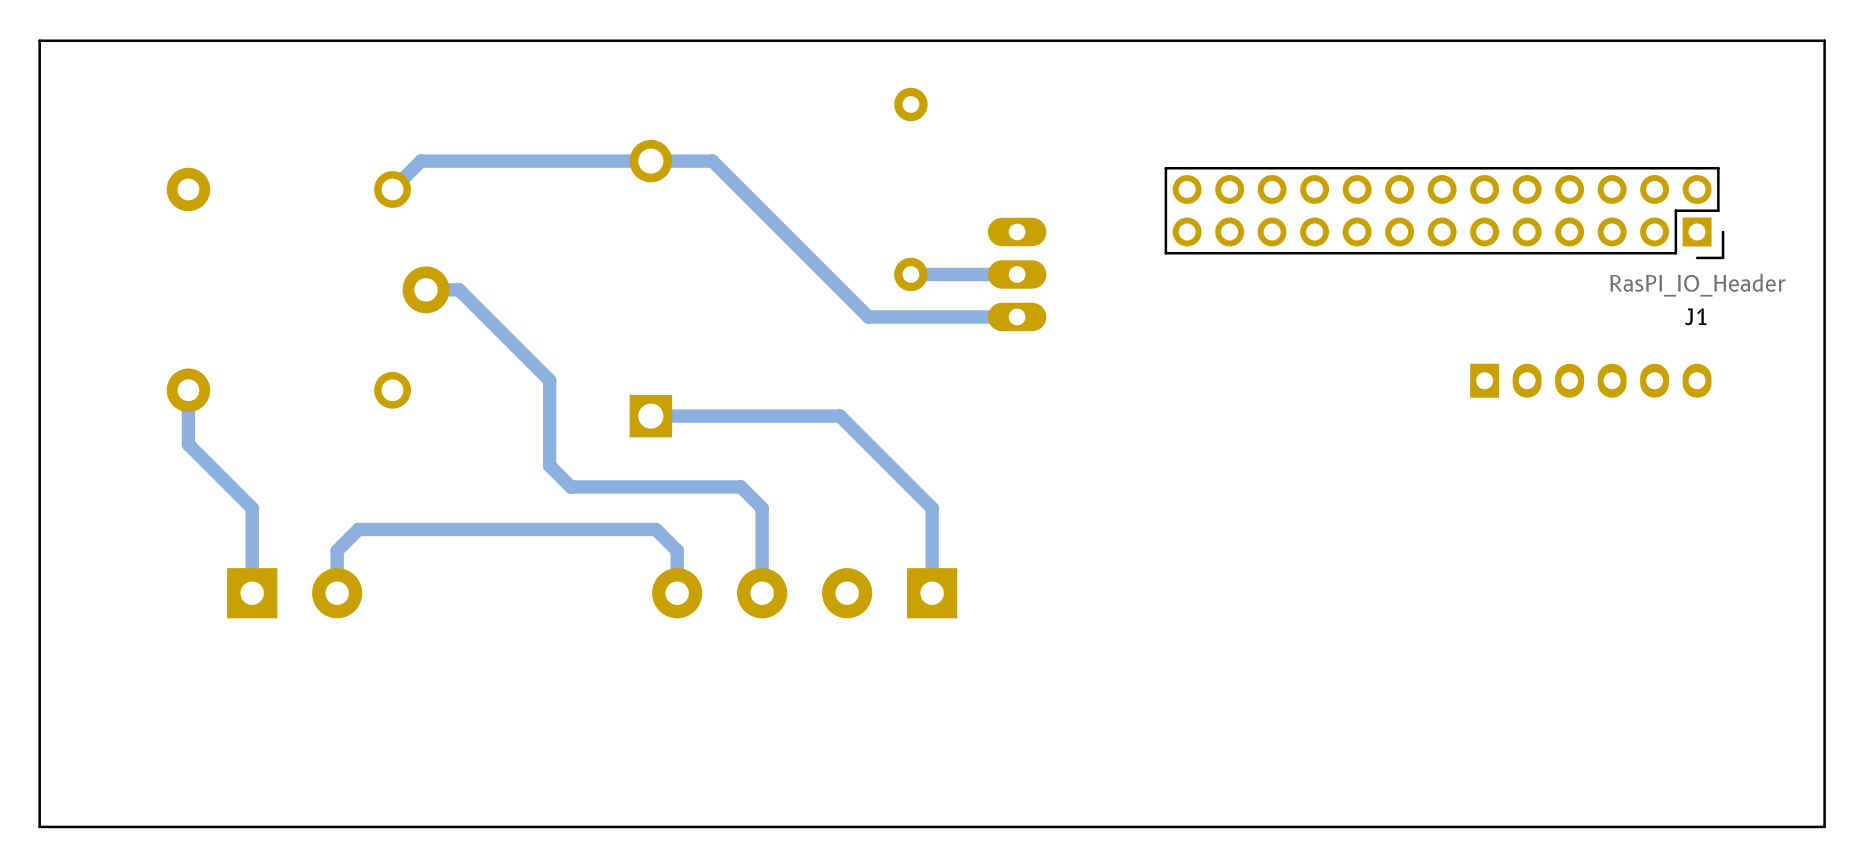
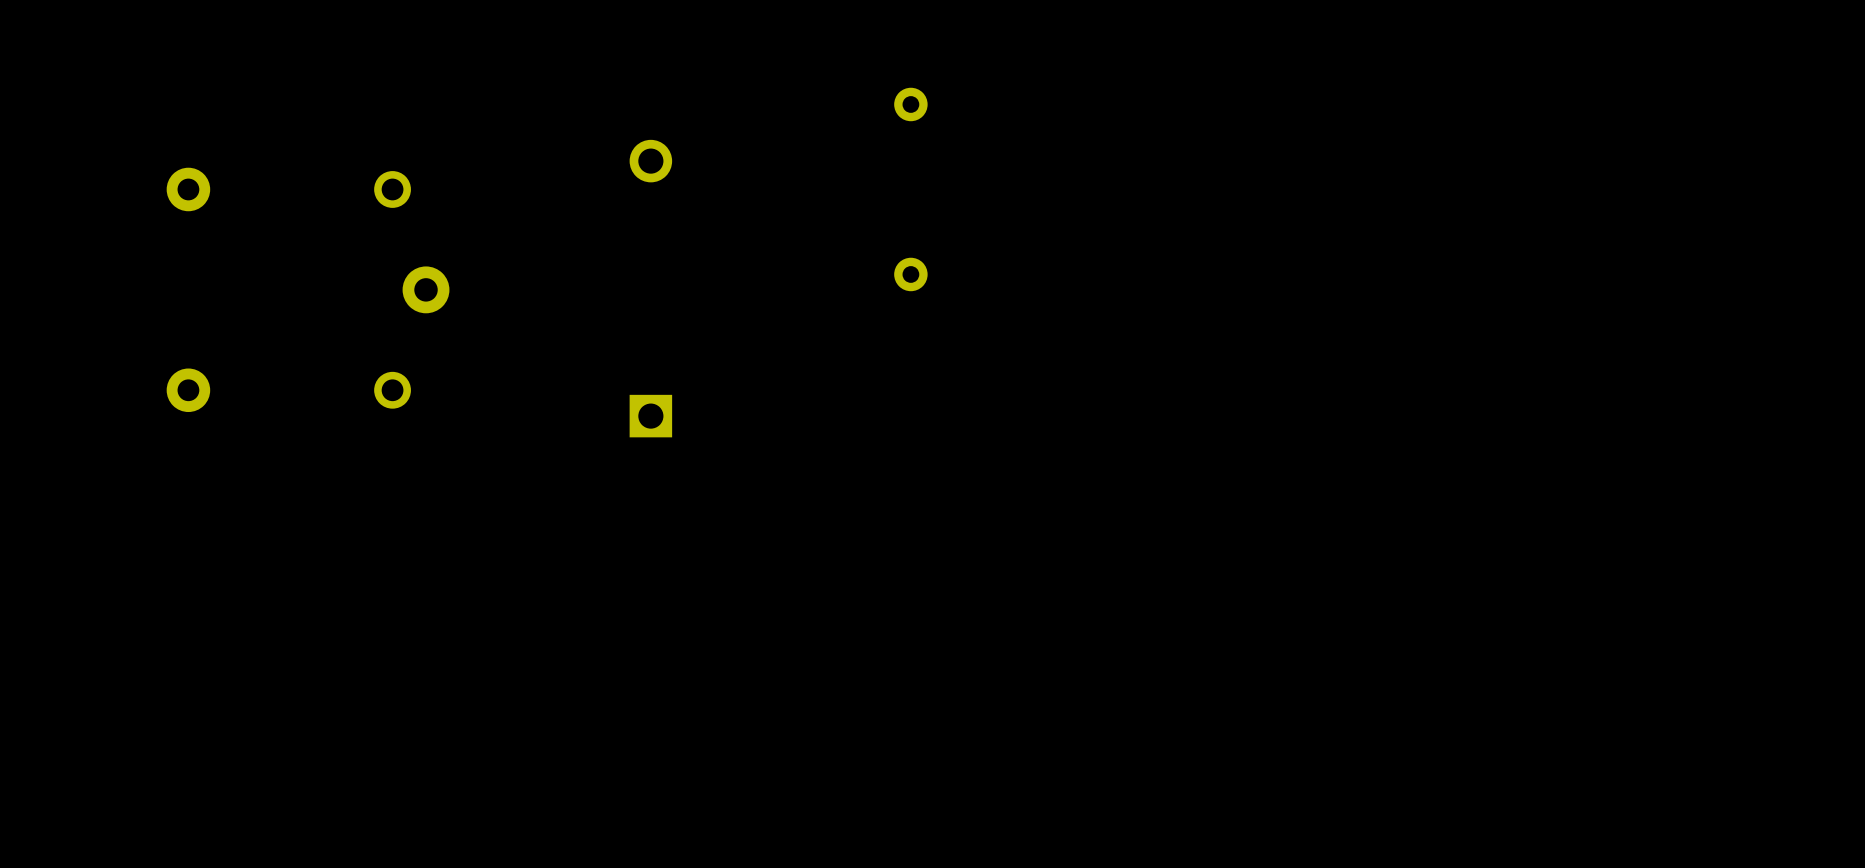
board edge: (1824, 40) (39, 40) (39, 826) (1824, 826) (1824, 40) -> none
track: (392, 189) (420, 161) (712, 161) (868, 316) (1017, 316) -> none
J1: RasPI_IO_Header (1444, 213) -> none
track: (1017, 274) (910, 274) -> none
part: (1017, 274) -> none
track: (426, 289) (459, 289) (549, 380) (549, 465) (570, 486) (740, 486) (762, 508) (762, 577) -> none
part: (1590, 380) -> none
track: (188, 390) (188, 444) (252, 508) (252, 593) -> none
track: (650, 416) (840, 416) (932, 508) (932, 577) -> none
track: (677, 577) (677, 550) (655, 529) (358, 529) (337, 550) (337, 593) -> none
part: (294, 593) -> none
part: (804, 593) -> none

